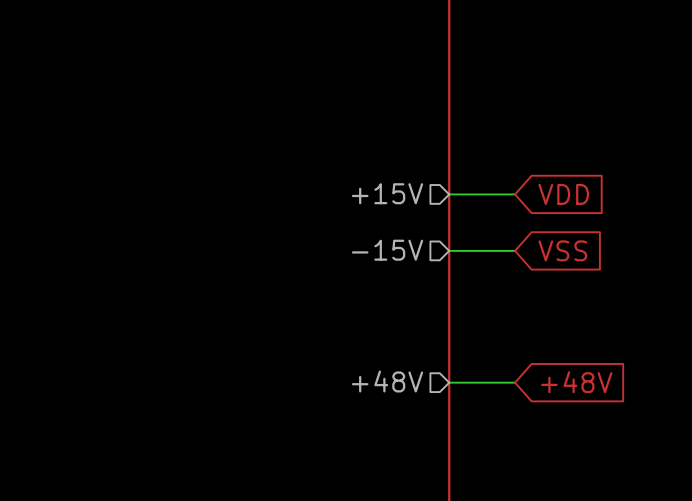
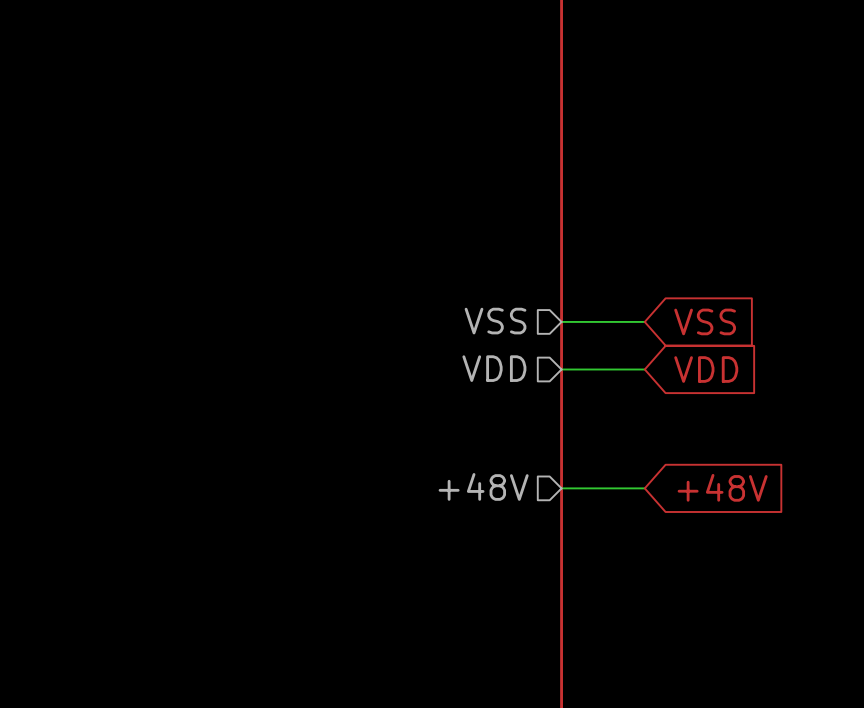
sheet pin: +15V (387, 193) -> none
wire: (449, 194) (515, 194) -> (561, 369) (644, 369)
global label position: VDD (563, 194) -> VDD (706, 369)
sheet pin: -15V (387, 250) -> VSS (495, 321)
sheet pin: none -> VDD (494, 368)

